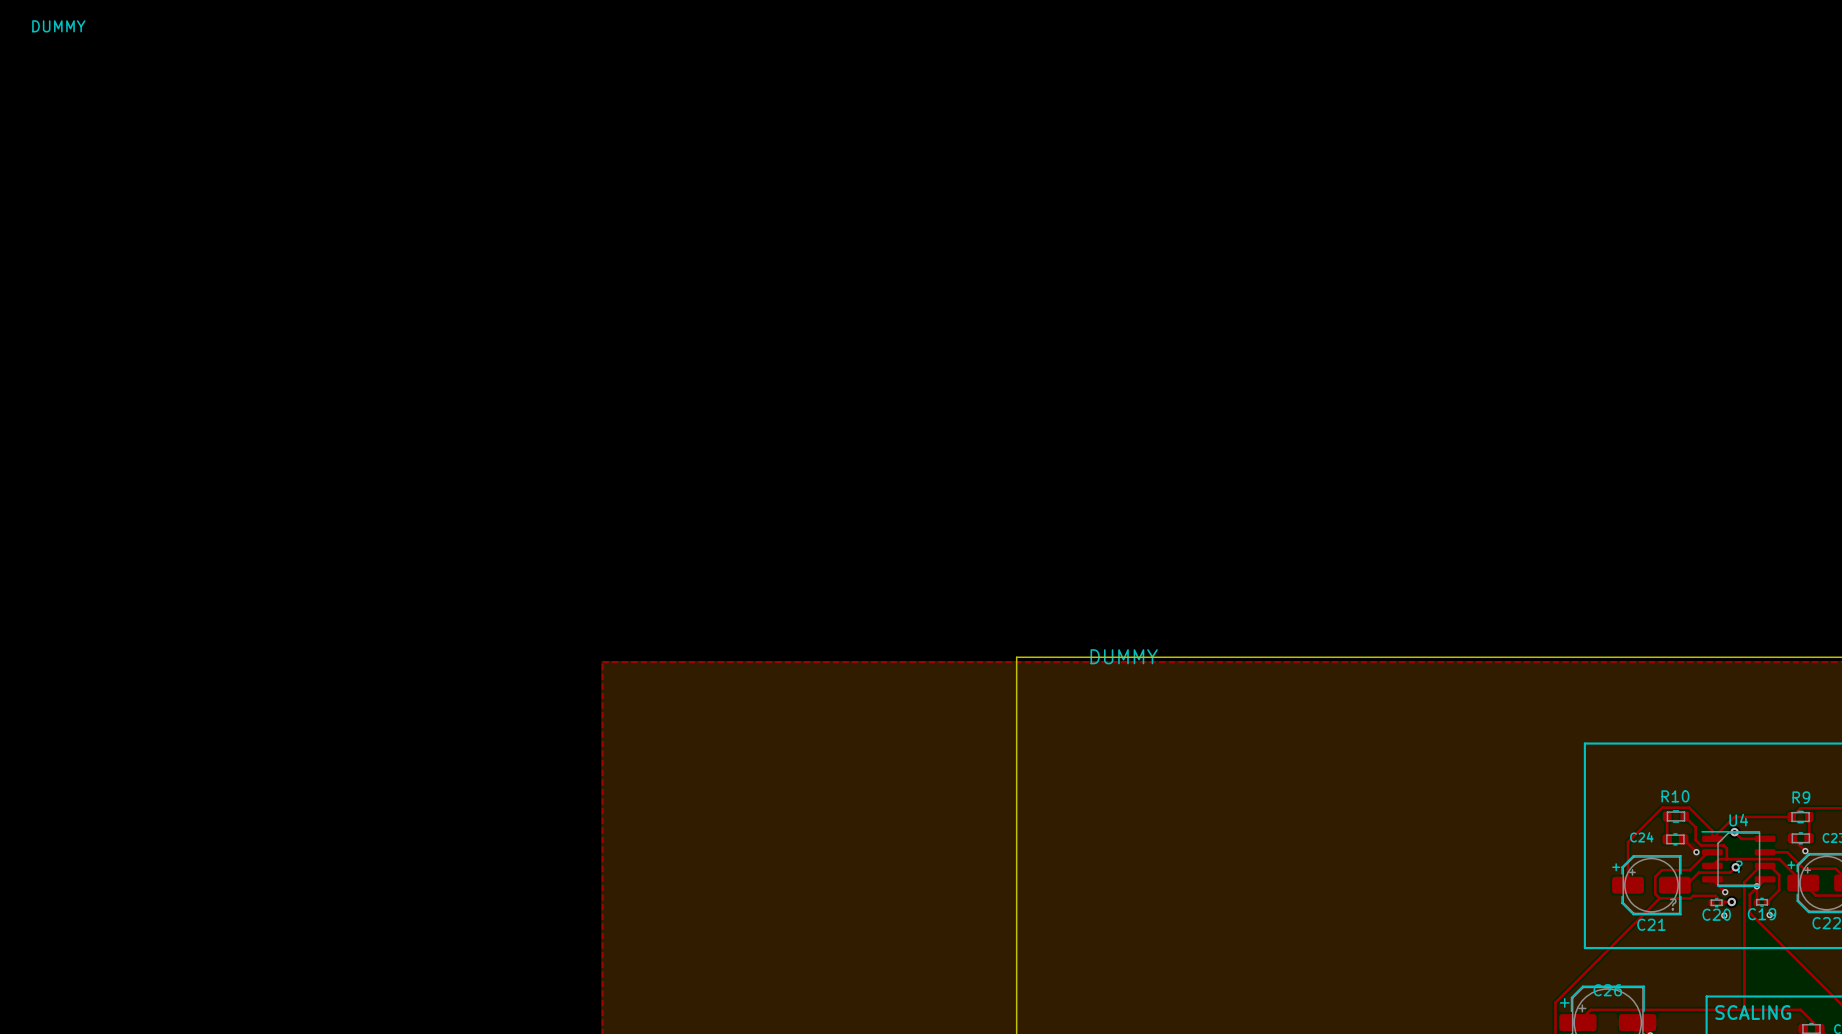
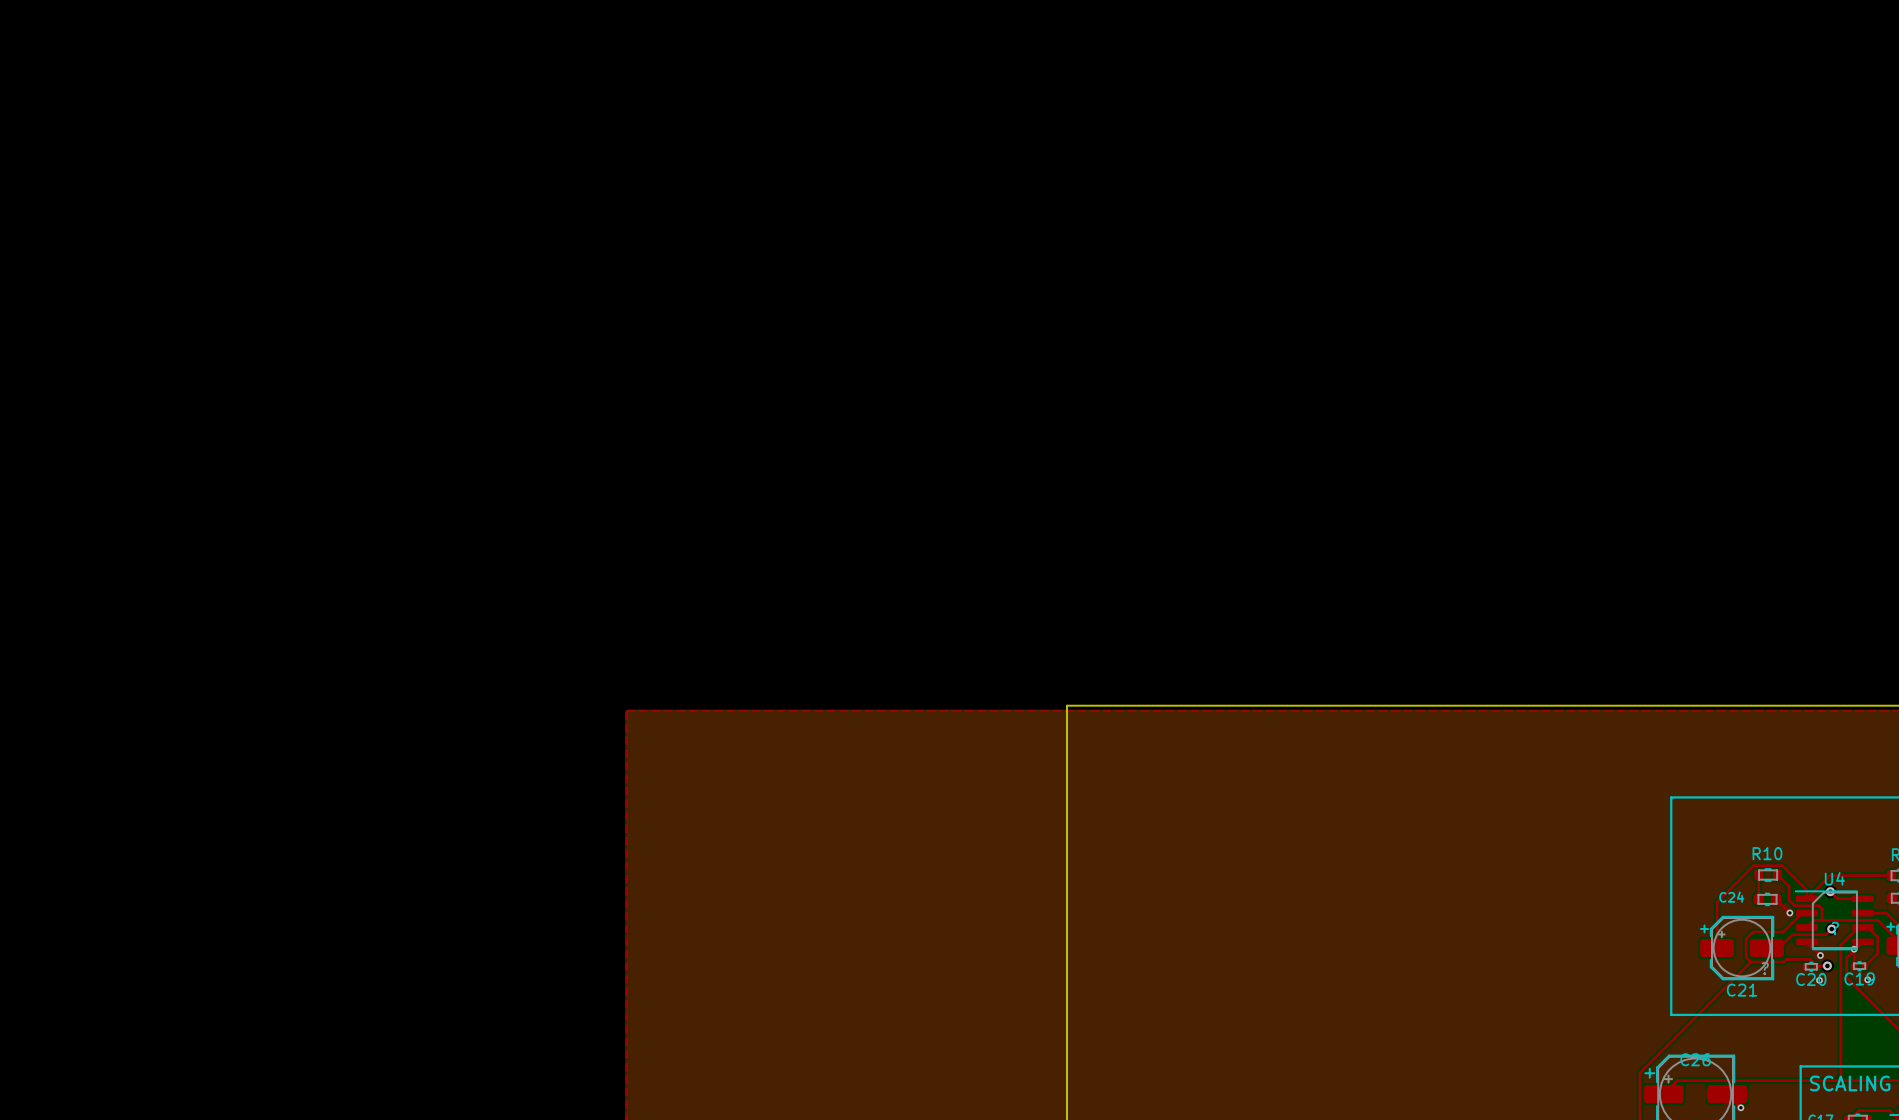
DUMMY: (58, 26) -> none
DUMMY: (1124, 656) -> none

